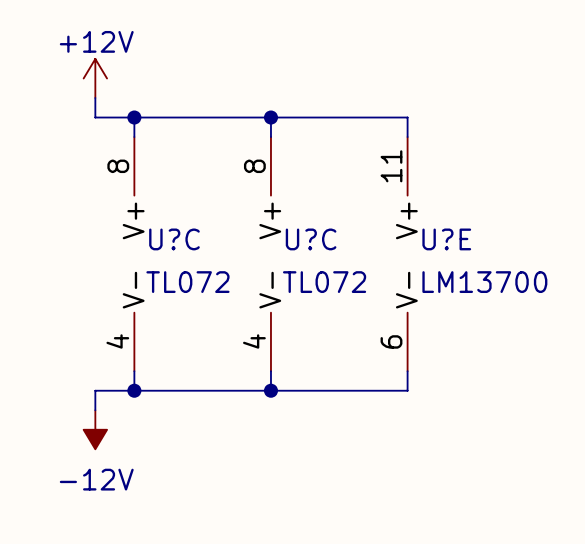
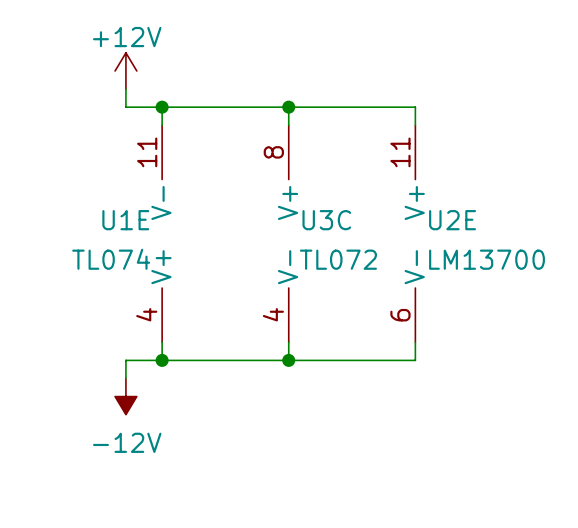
U?C pin number: 8 (118, 166) -> 11 (147, 152)
U?C pin name: V+ (133, 220) -> V- (161, 202)
U?C name: U?C (174, 239) -> U1E (125, 220)
U?C name: U?C (311, 239) -> U3C (326, 220)
U?E name: U?E (446, 239) -> U2E (452, 220)
U?C value: TL072 (187, 282) -> TL074 (111, 259)
U?C pin name: V- (133, 290) -> V+ (161, 267)

